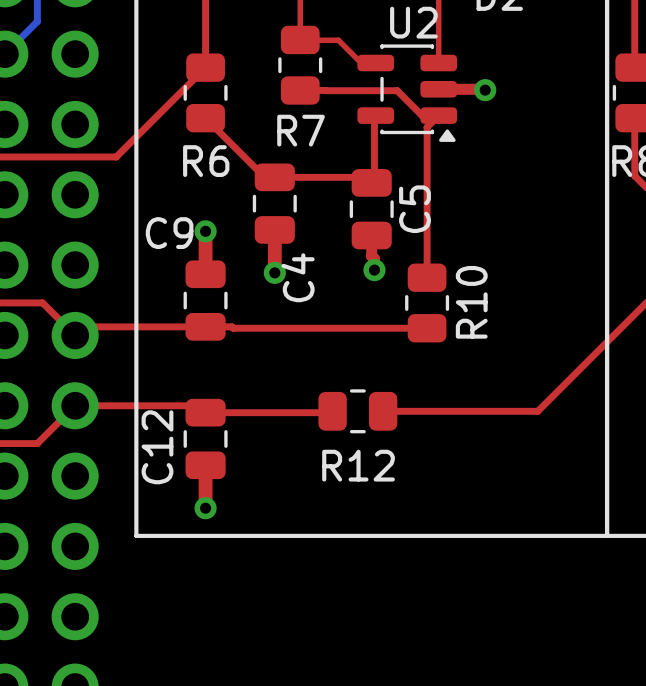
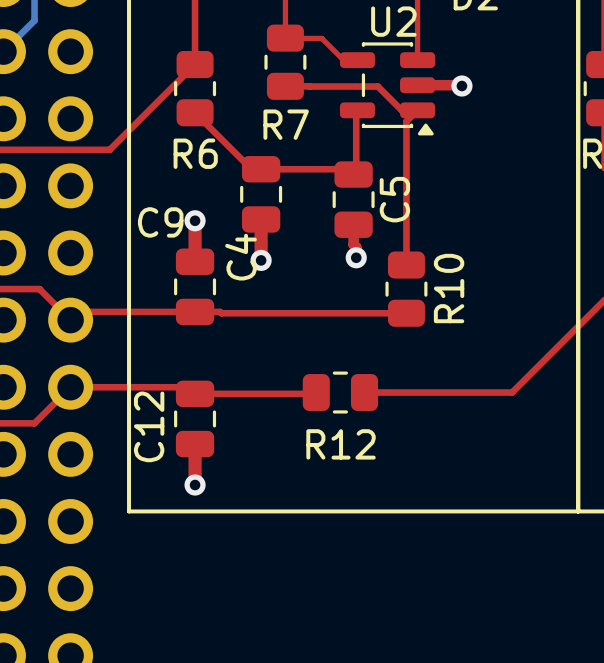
C4 name position: C4 (298, 277) -> C4 (241, 257)

